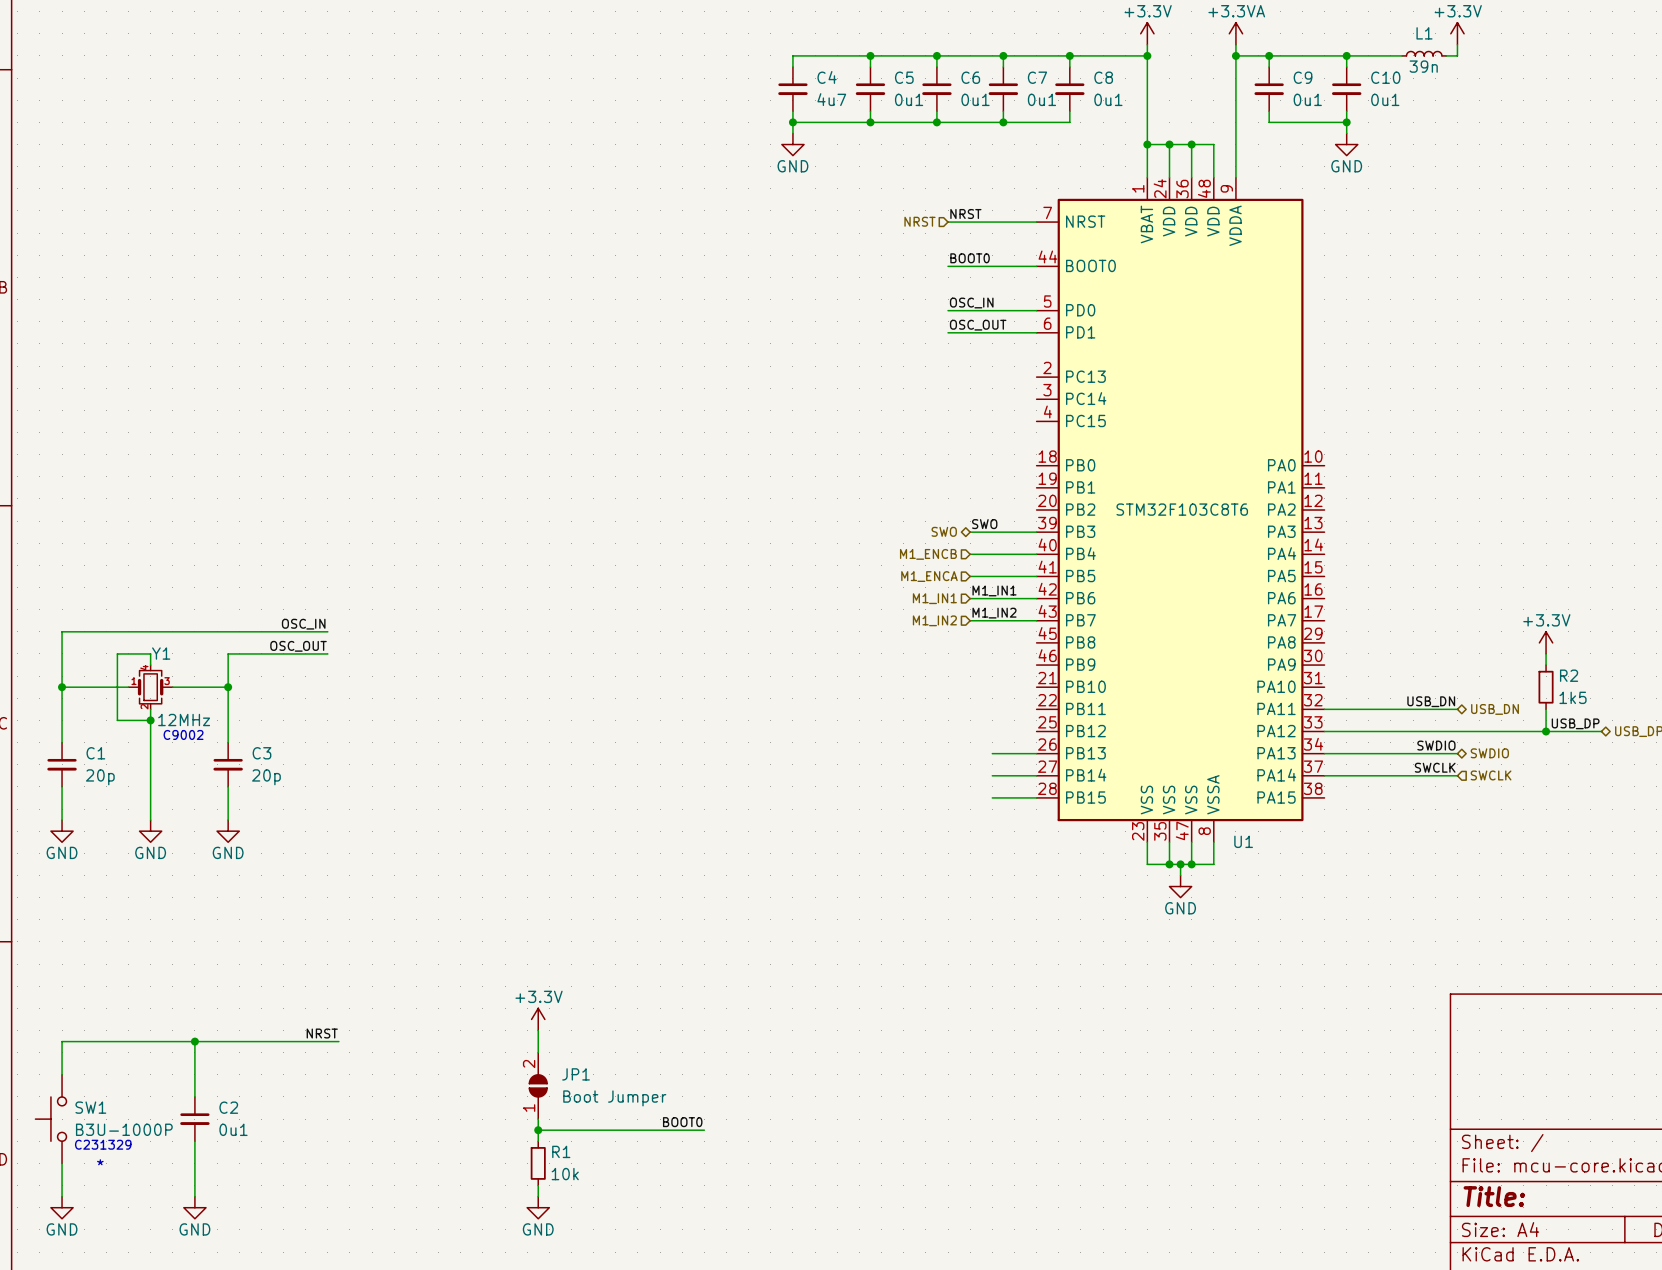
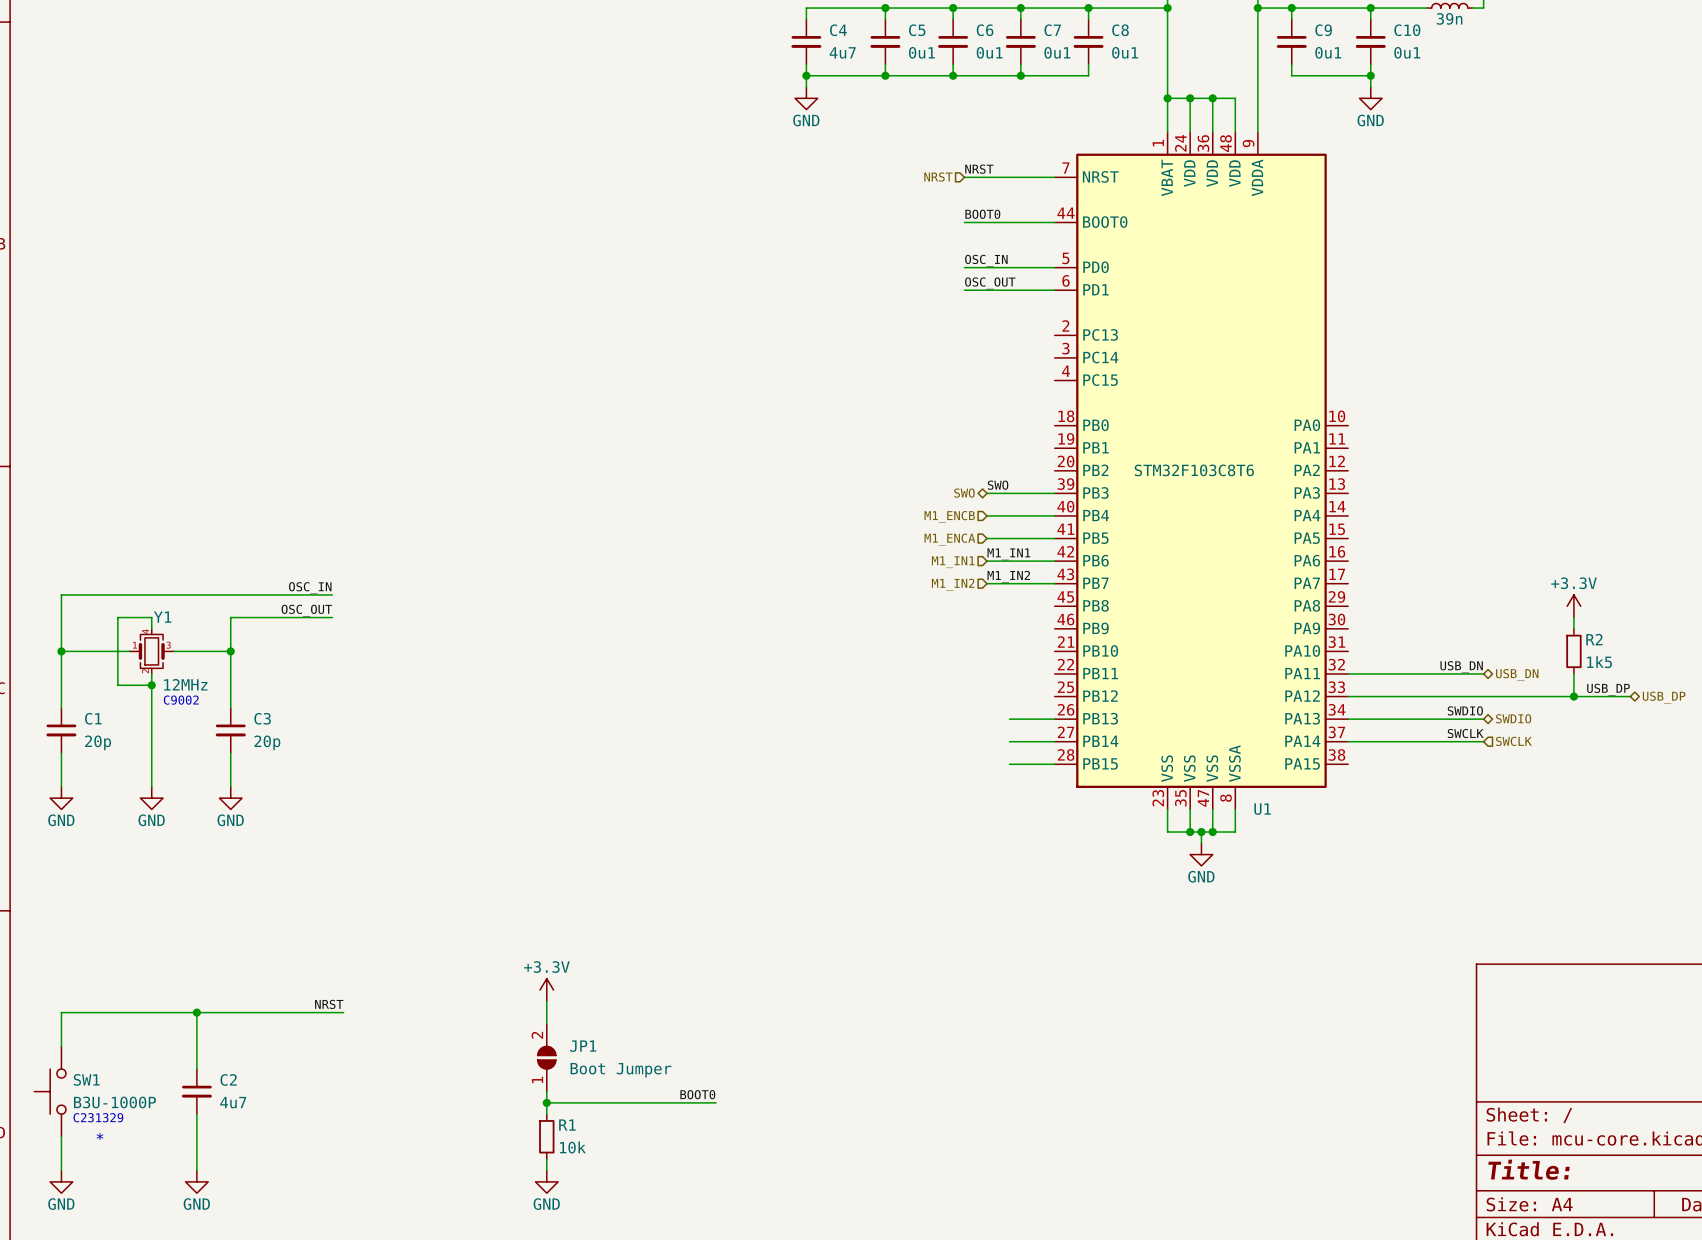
C2 value: 0u1 (233, 1129) -> 4u7 (233, 1102)

